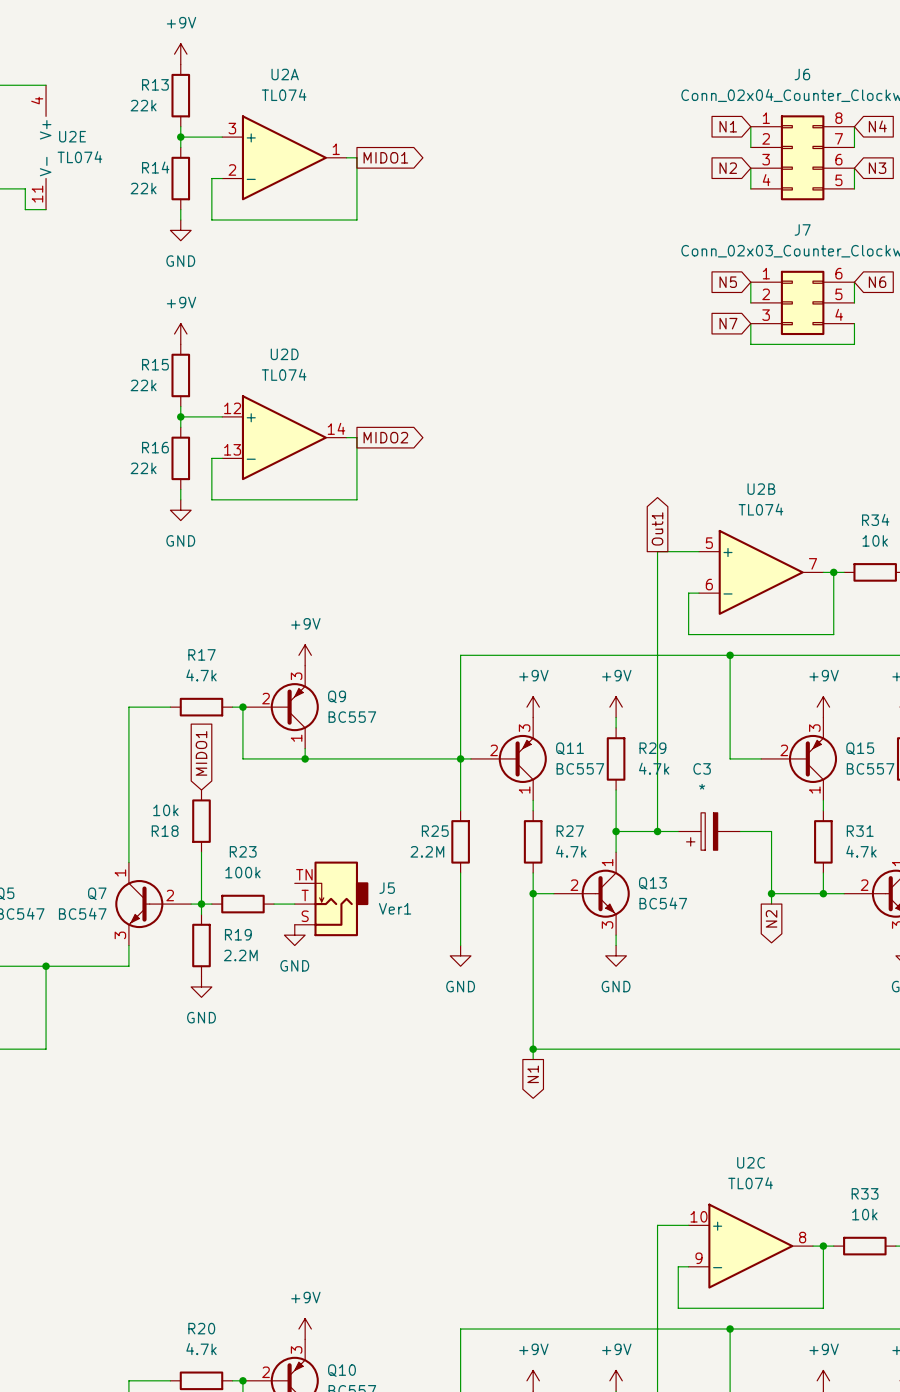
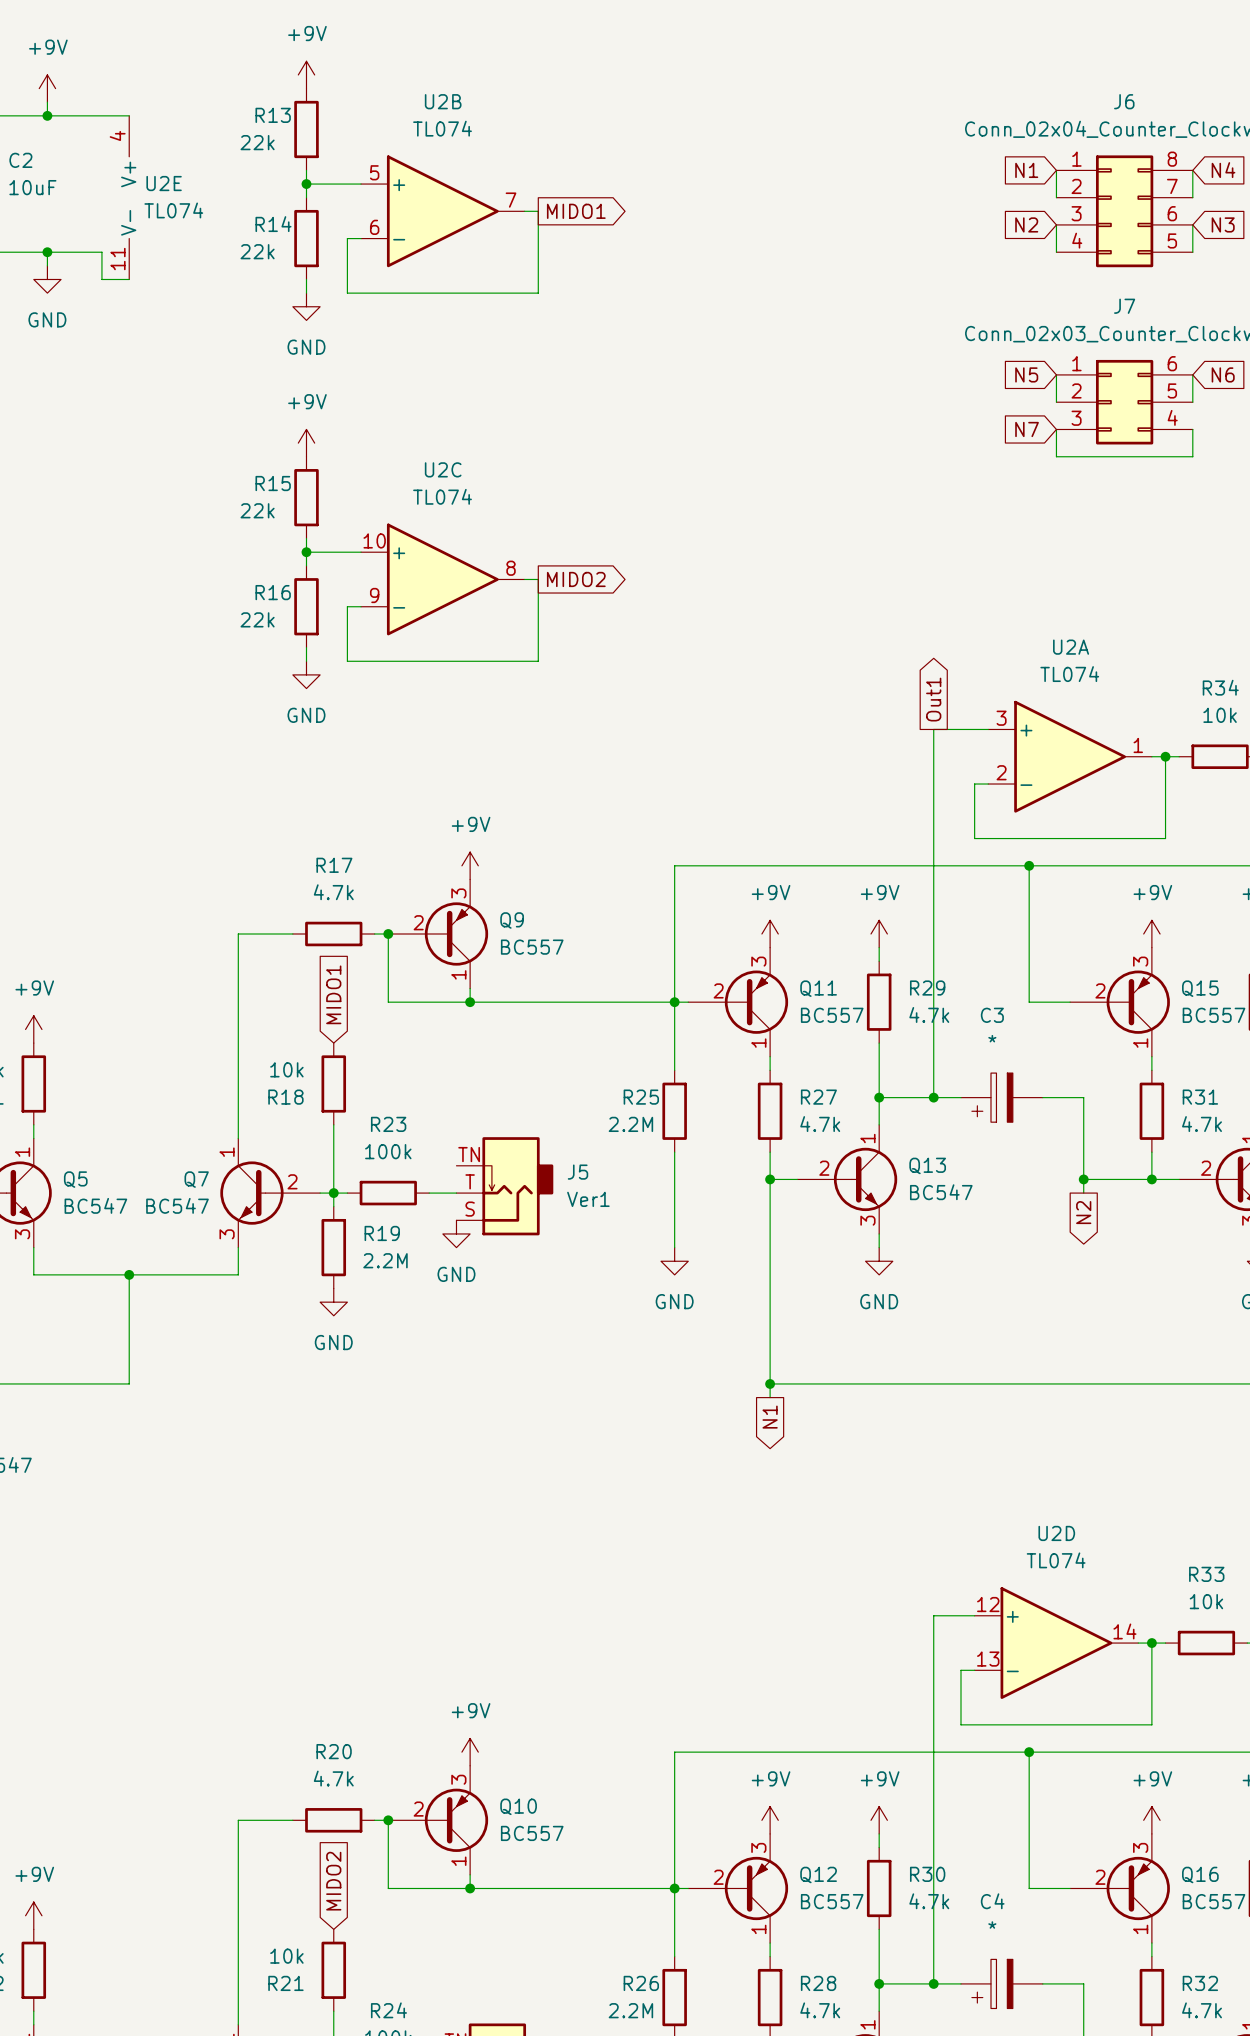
U2A position: (284, 157) -> (1070, 756)
U2D position: (284, 437) -> (1056, 1643)
U2B position: (761, 572) -> (442, 211)
U2C position: (750, 1246) -> (442, 579)

